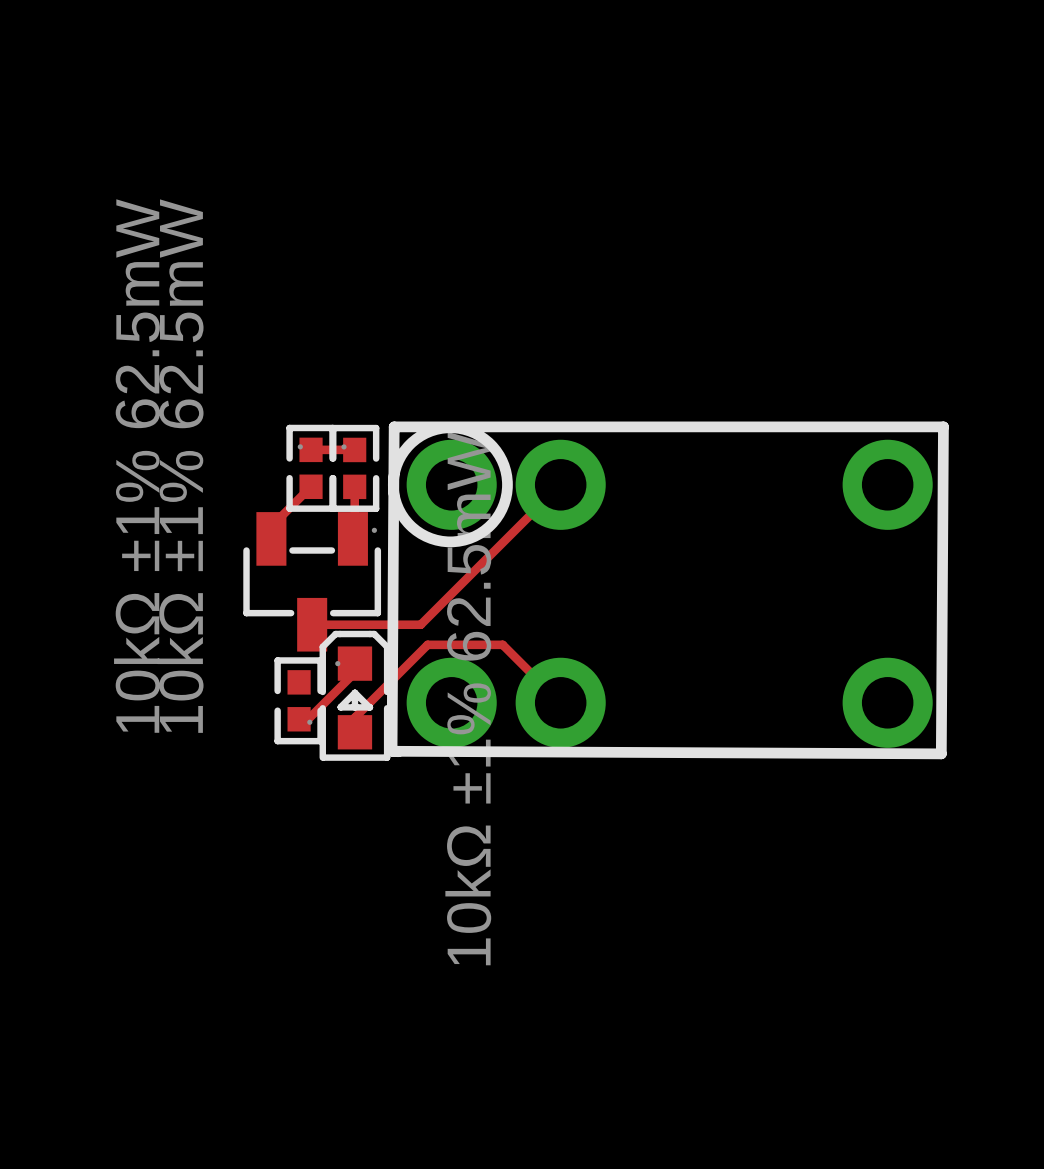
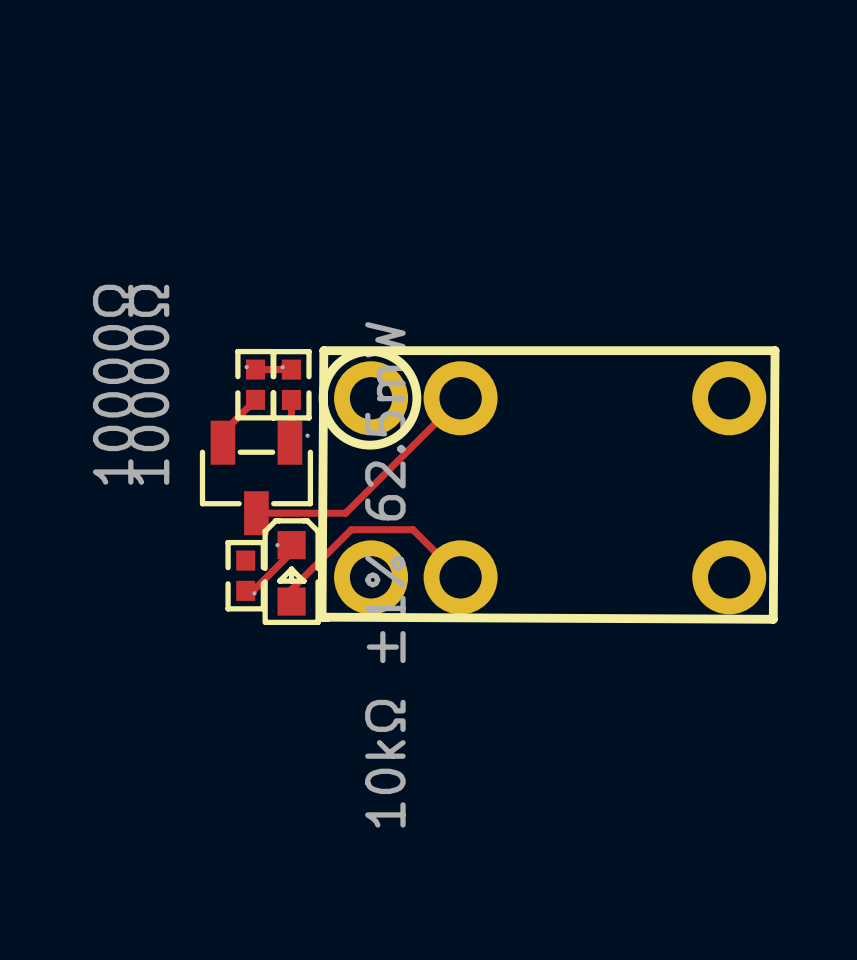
part value: 10kΩ ±1% 62.5mW (136, 466) -> 10000Ω (113, 384)
part value: 10kΩ ±1% 62.5mW (180, 466) -> 10000Ω (149, 384)

